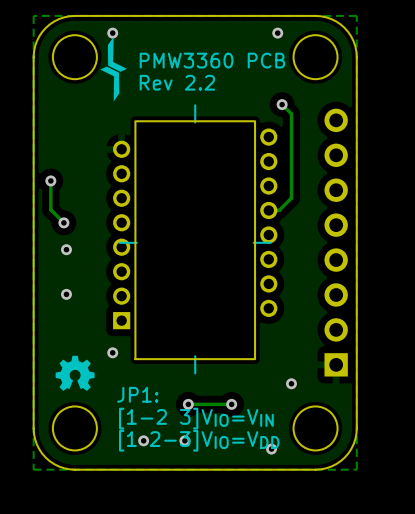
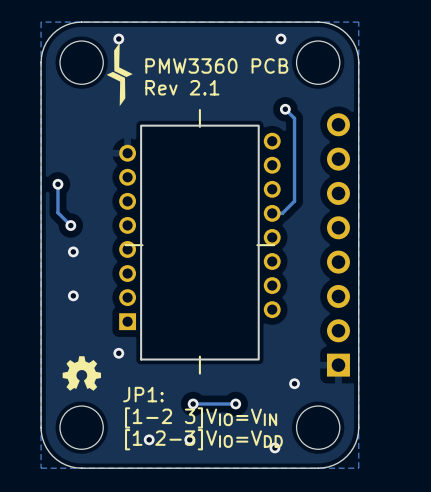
text: Rev 2.2 (177, 82) -> Rev 2.1 (182, 87)

